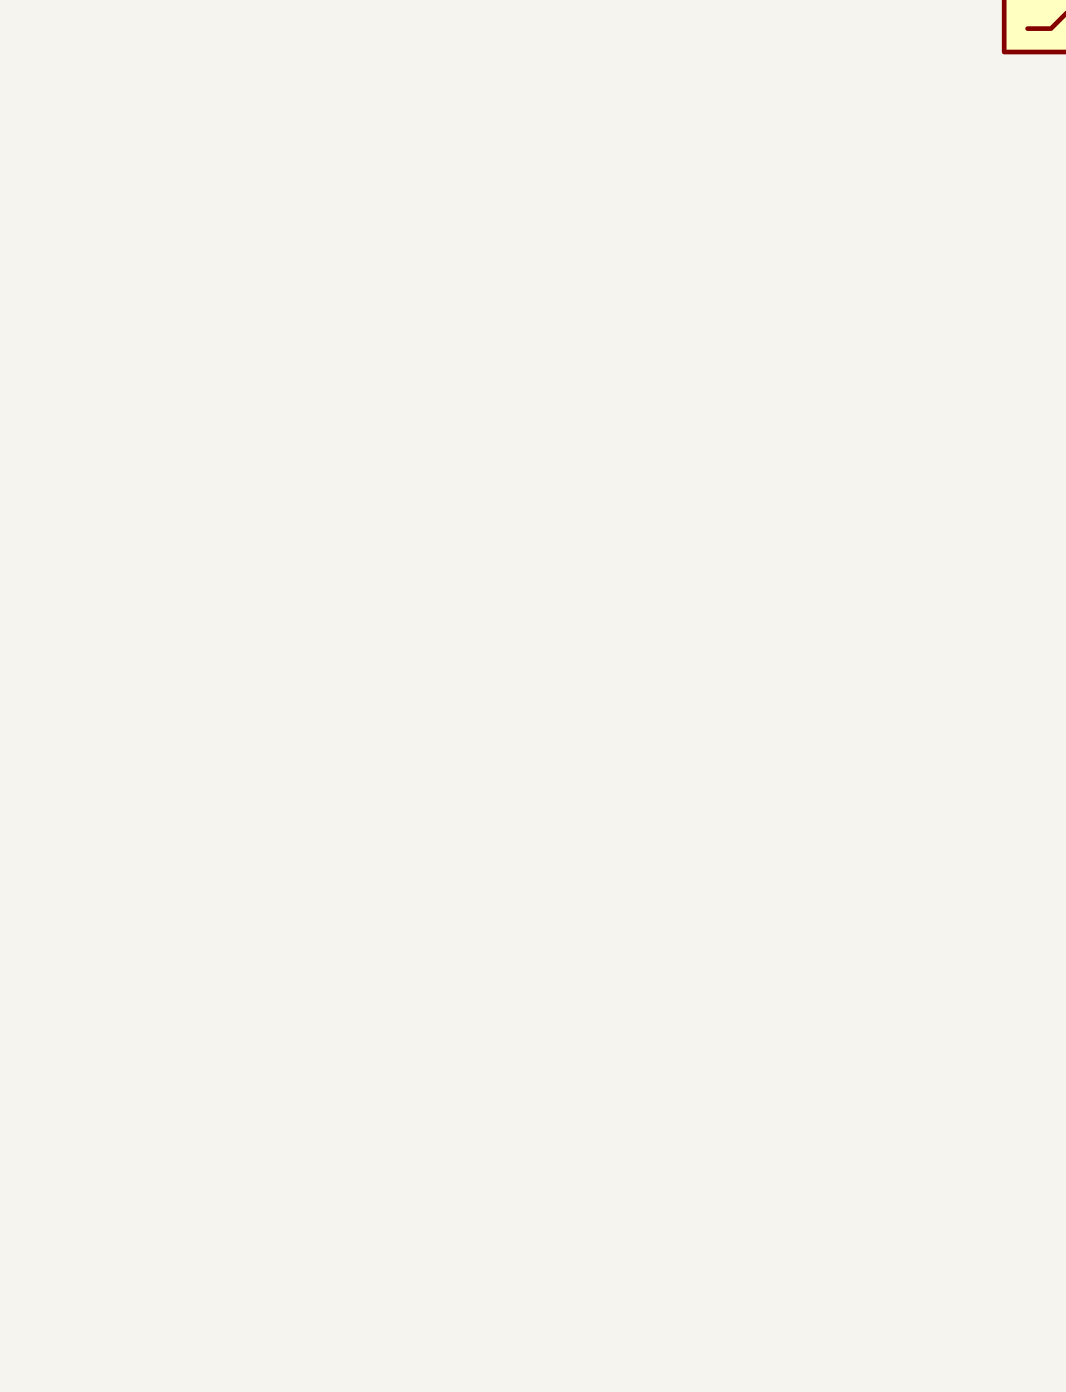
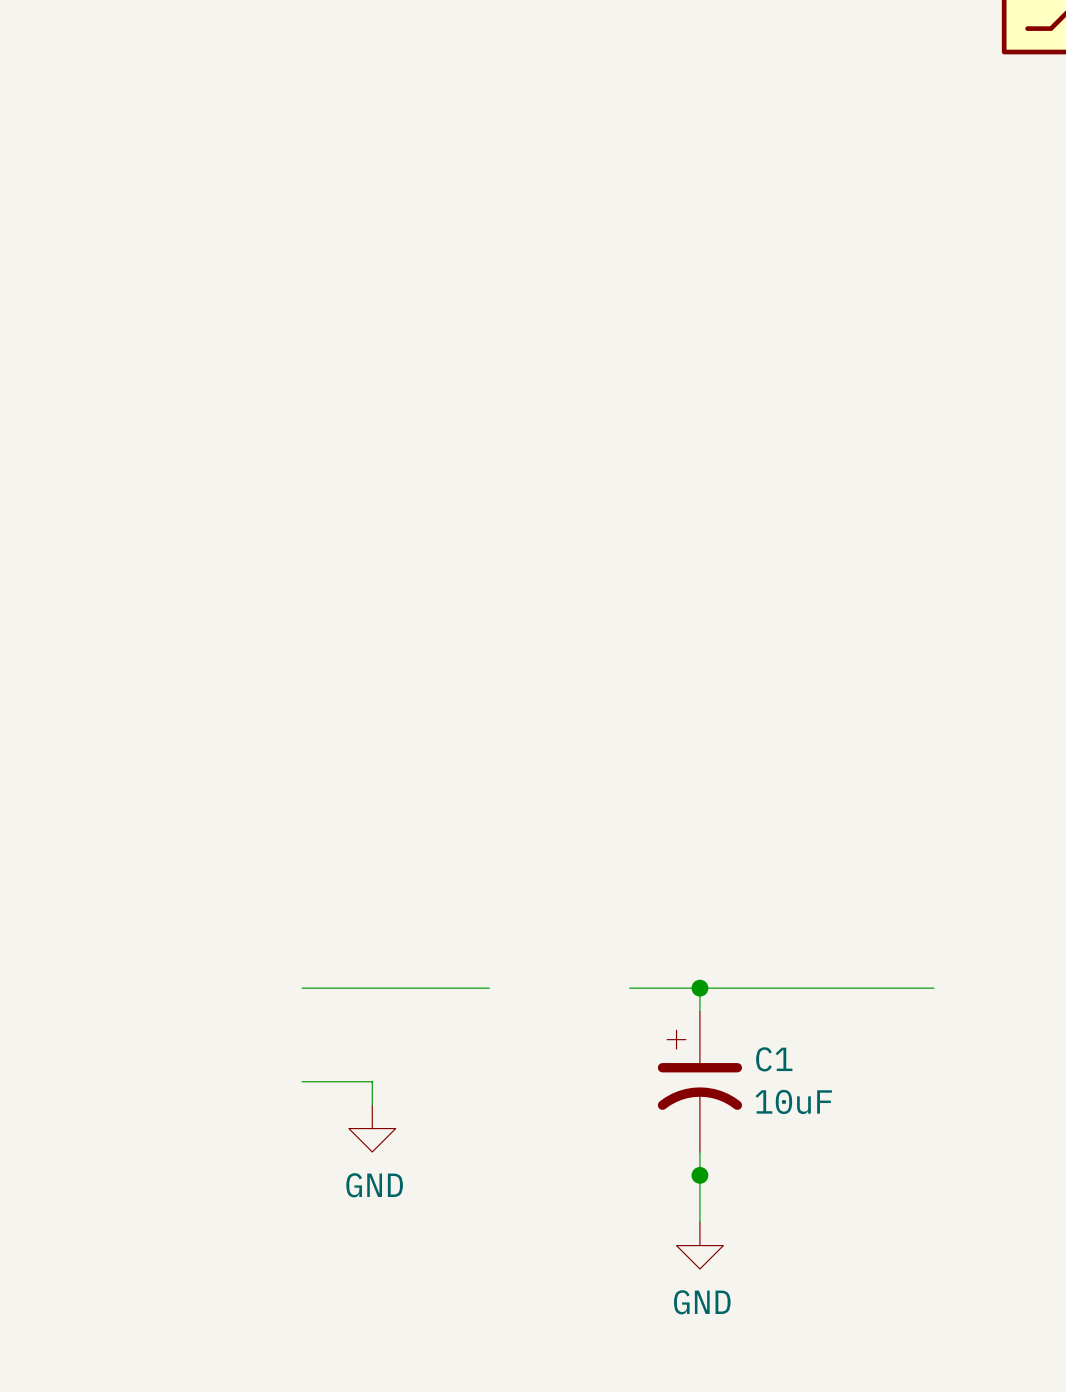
wire: none -> (302, 988) (489, 988)
wire: none -> (629, 988) (933, 988)
wire: none -> (699, 988) (699, 1011)
junction: none -> (699, 988)
wire: none -> (302, 1081) (372, 1081) (372, 1105)
C1: none -> 10uF (699, 1081)
power symbol: none -> GND (372, 1128)
wire: none -> (699, 1151) (699, 1222)
junction: none -> (699, 1175)
power symbol: none -> GND (699, 1245)

